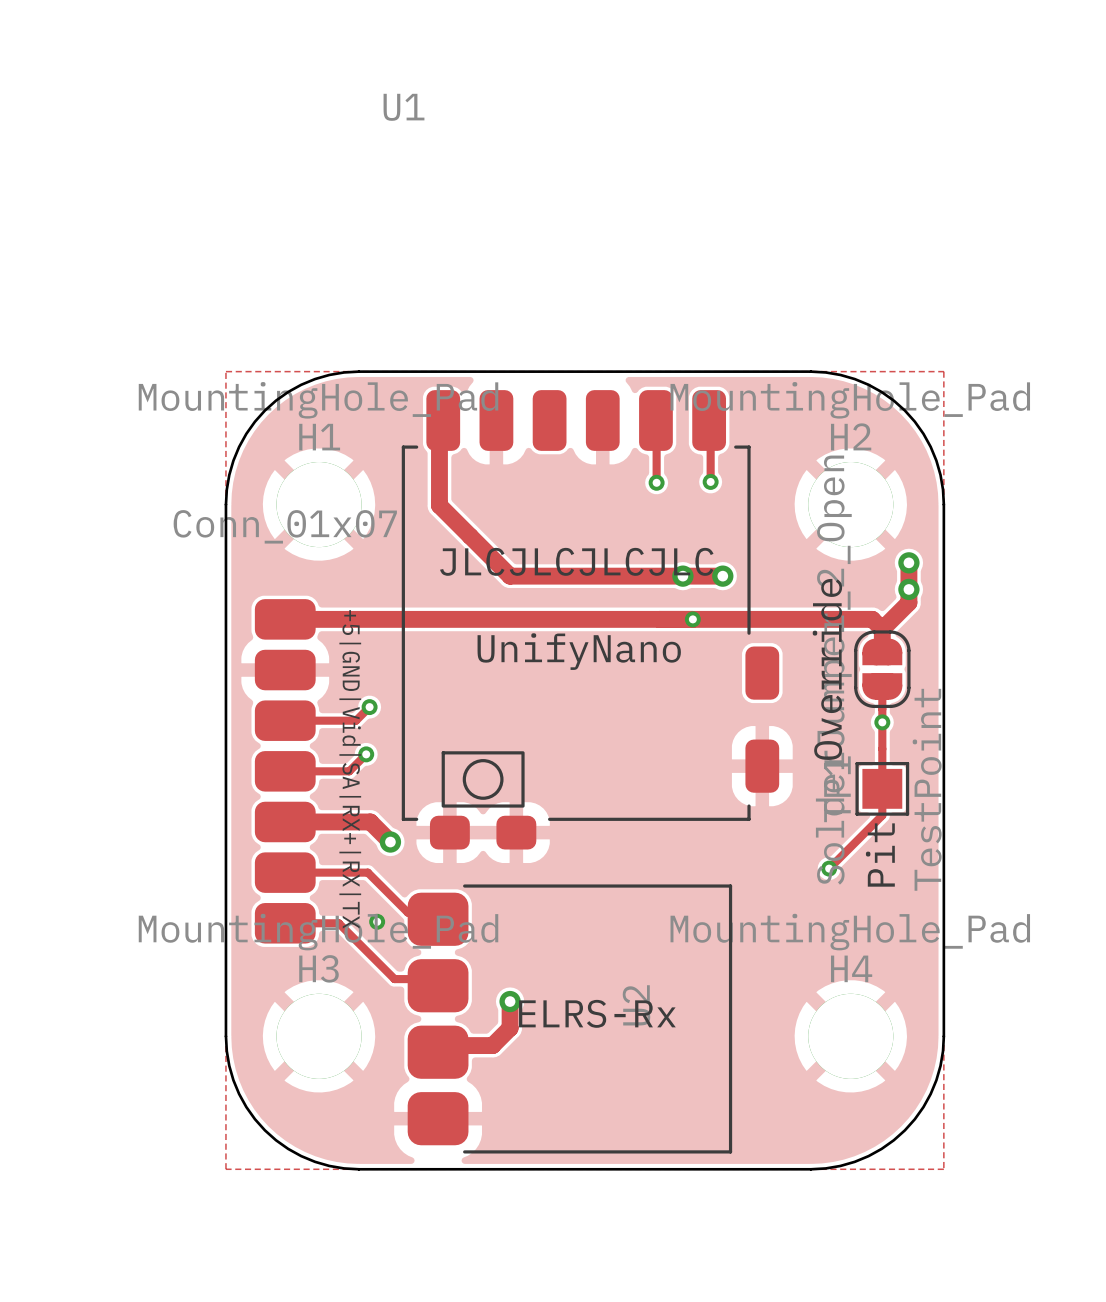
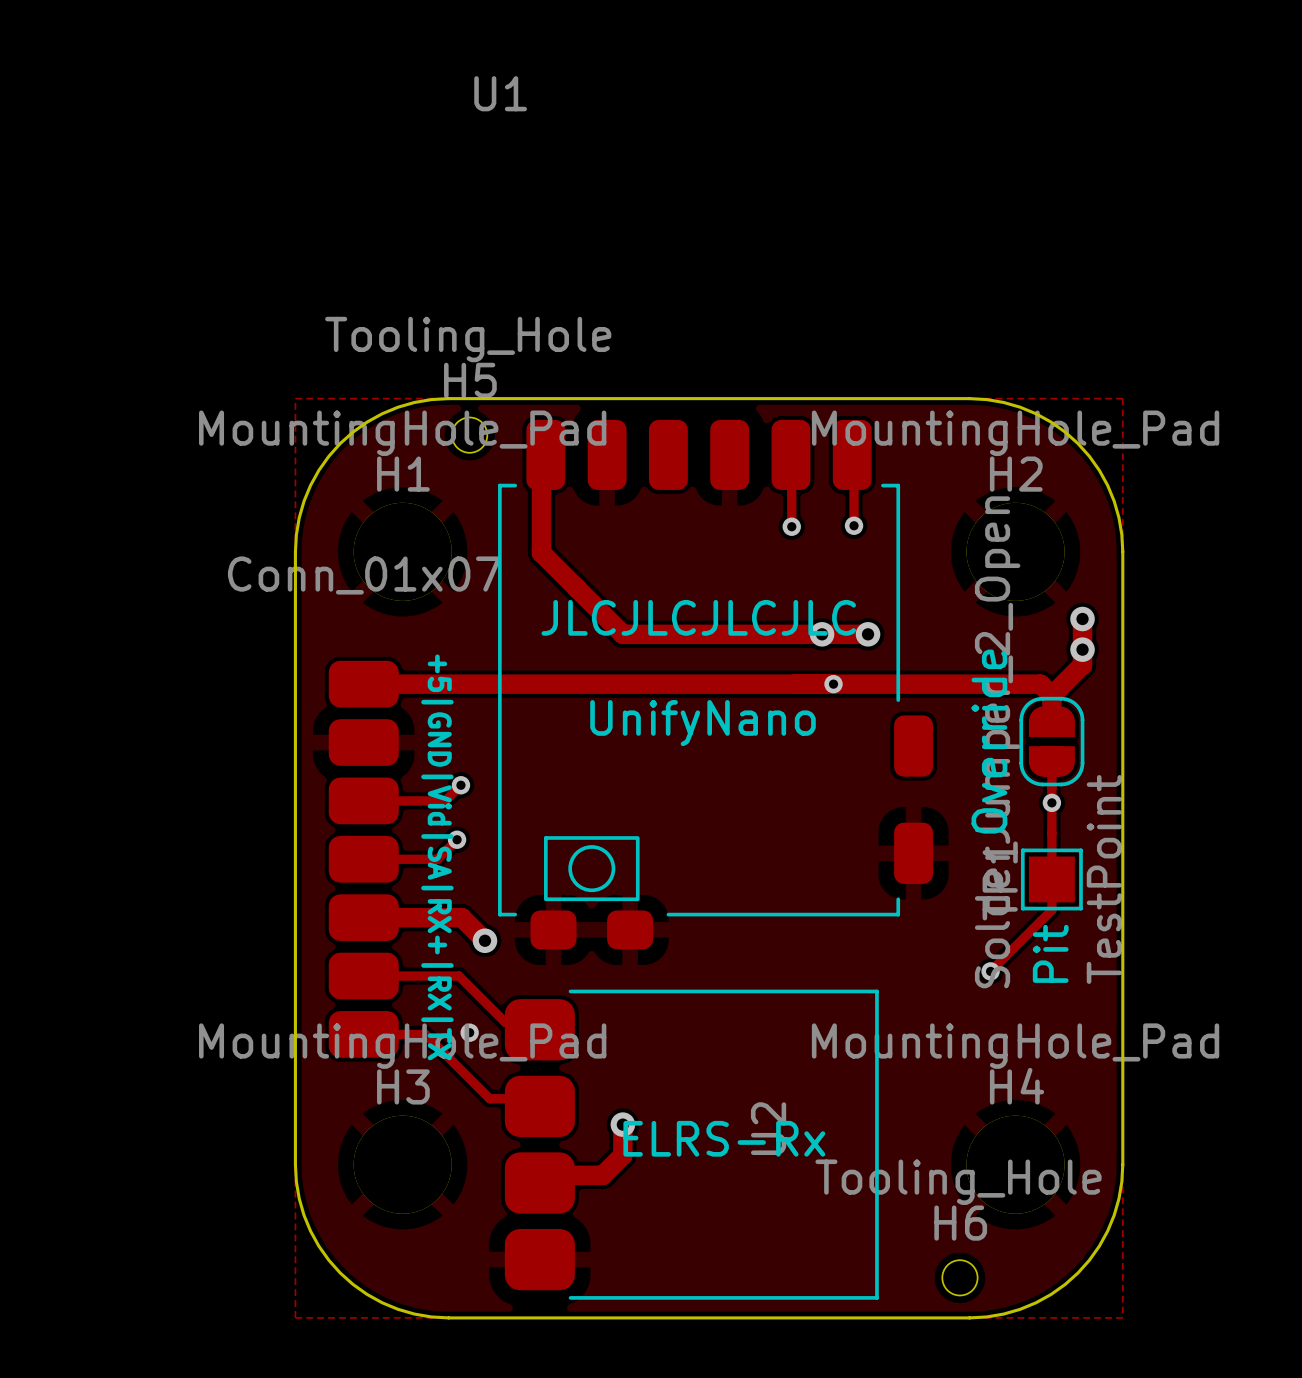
H5: none -> Tooling_Hole (469, 435)
H6: none -> Tooling_Hole (959, 1277)

